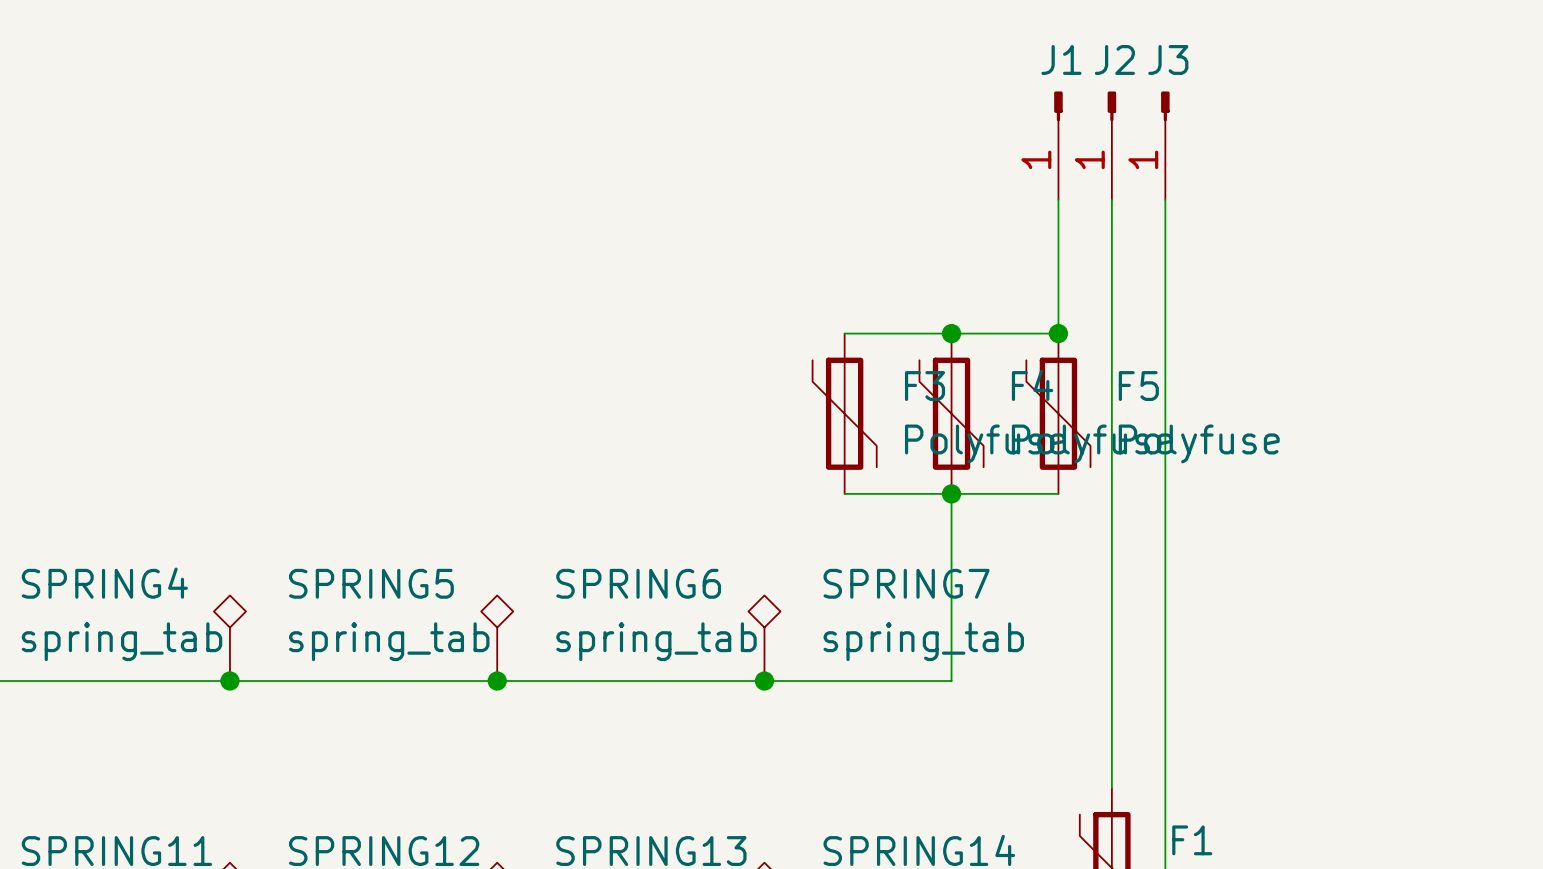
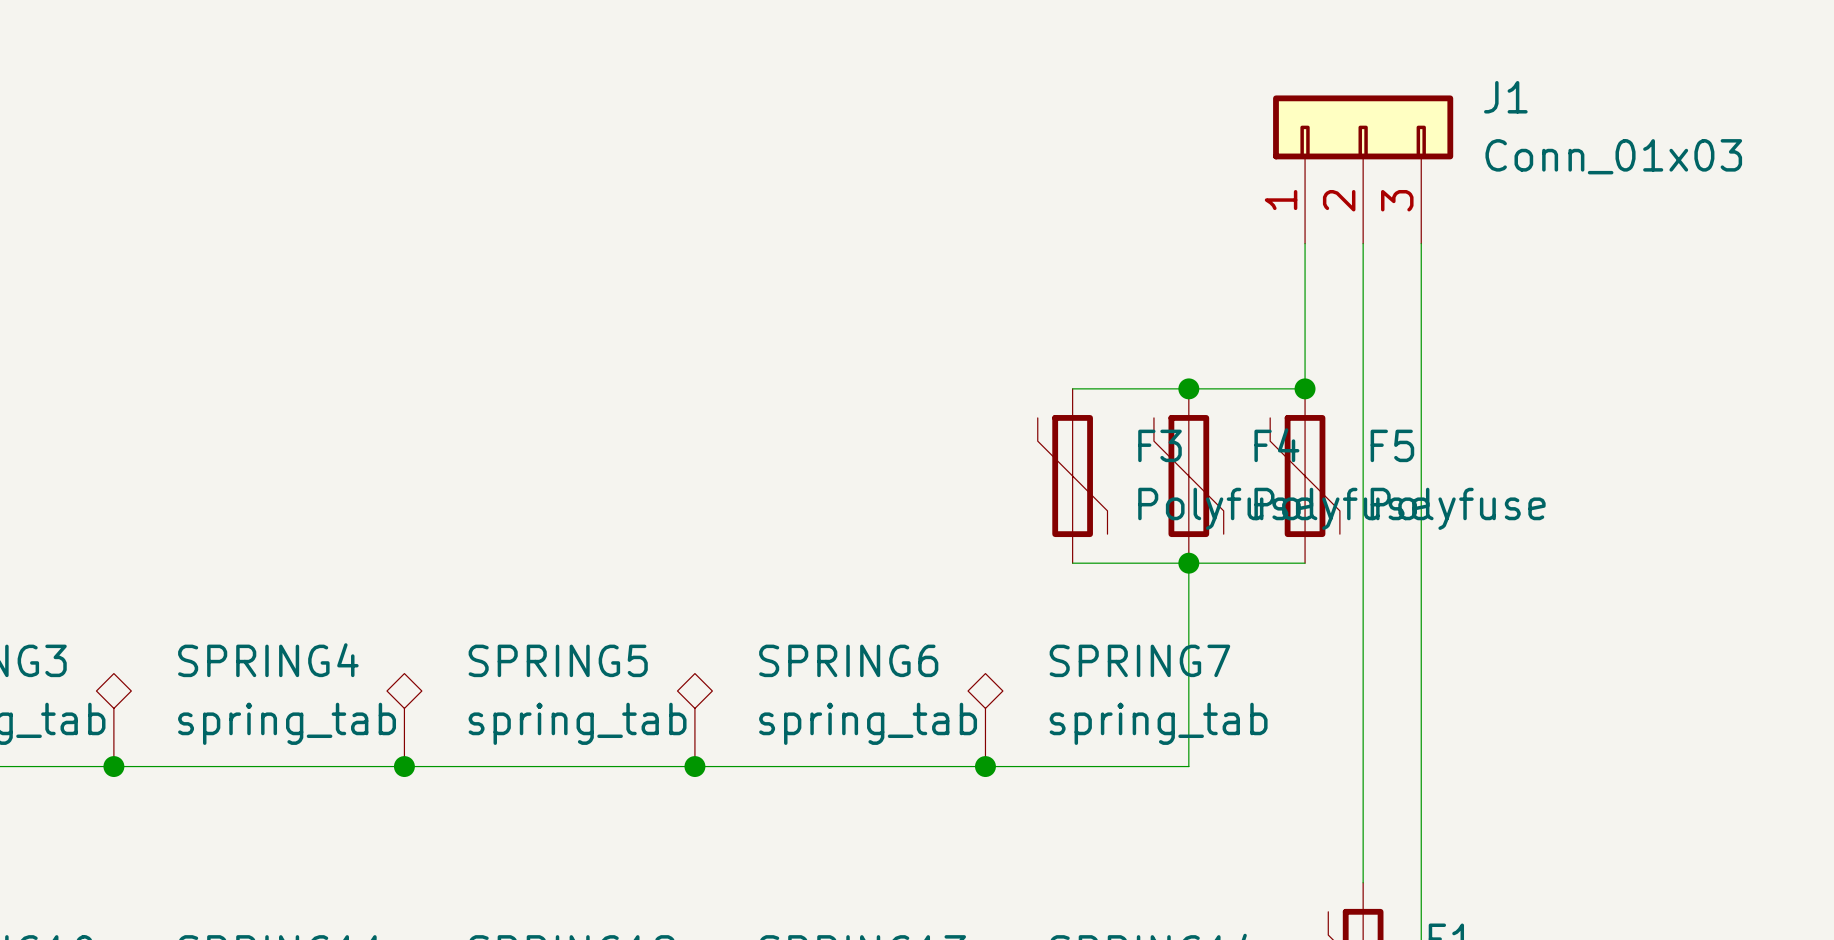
J1 name position: J1 (1061, 59) -> J1 (1505, 97)
J1 symbol: [1054, 91, 1063, 200] -> [1273, 95, 1454, 244]
J1 value: none -> Conn_01x03 (1613, 156)
J2: (1111, 145) -> none
J3: (1165, 145) -> none

